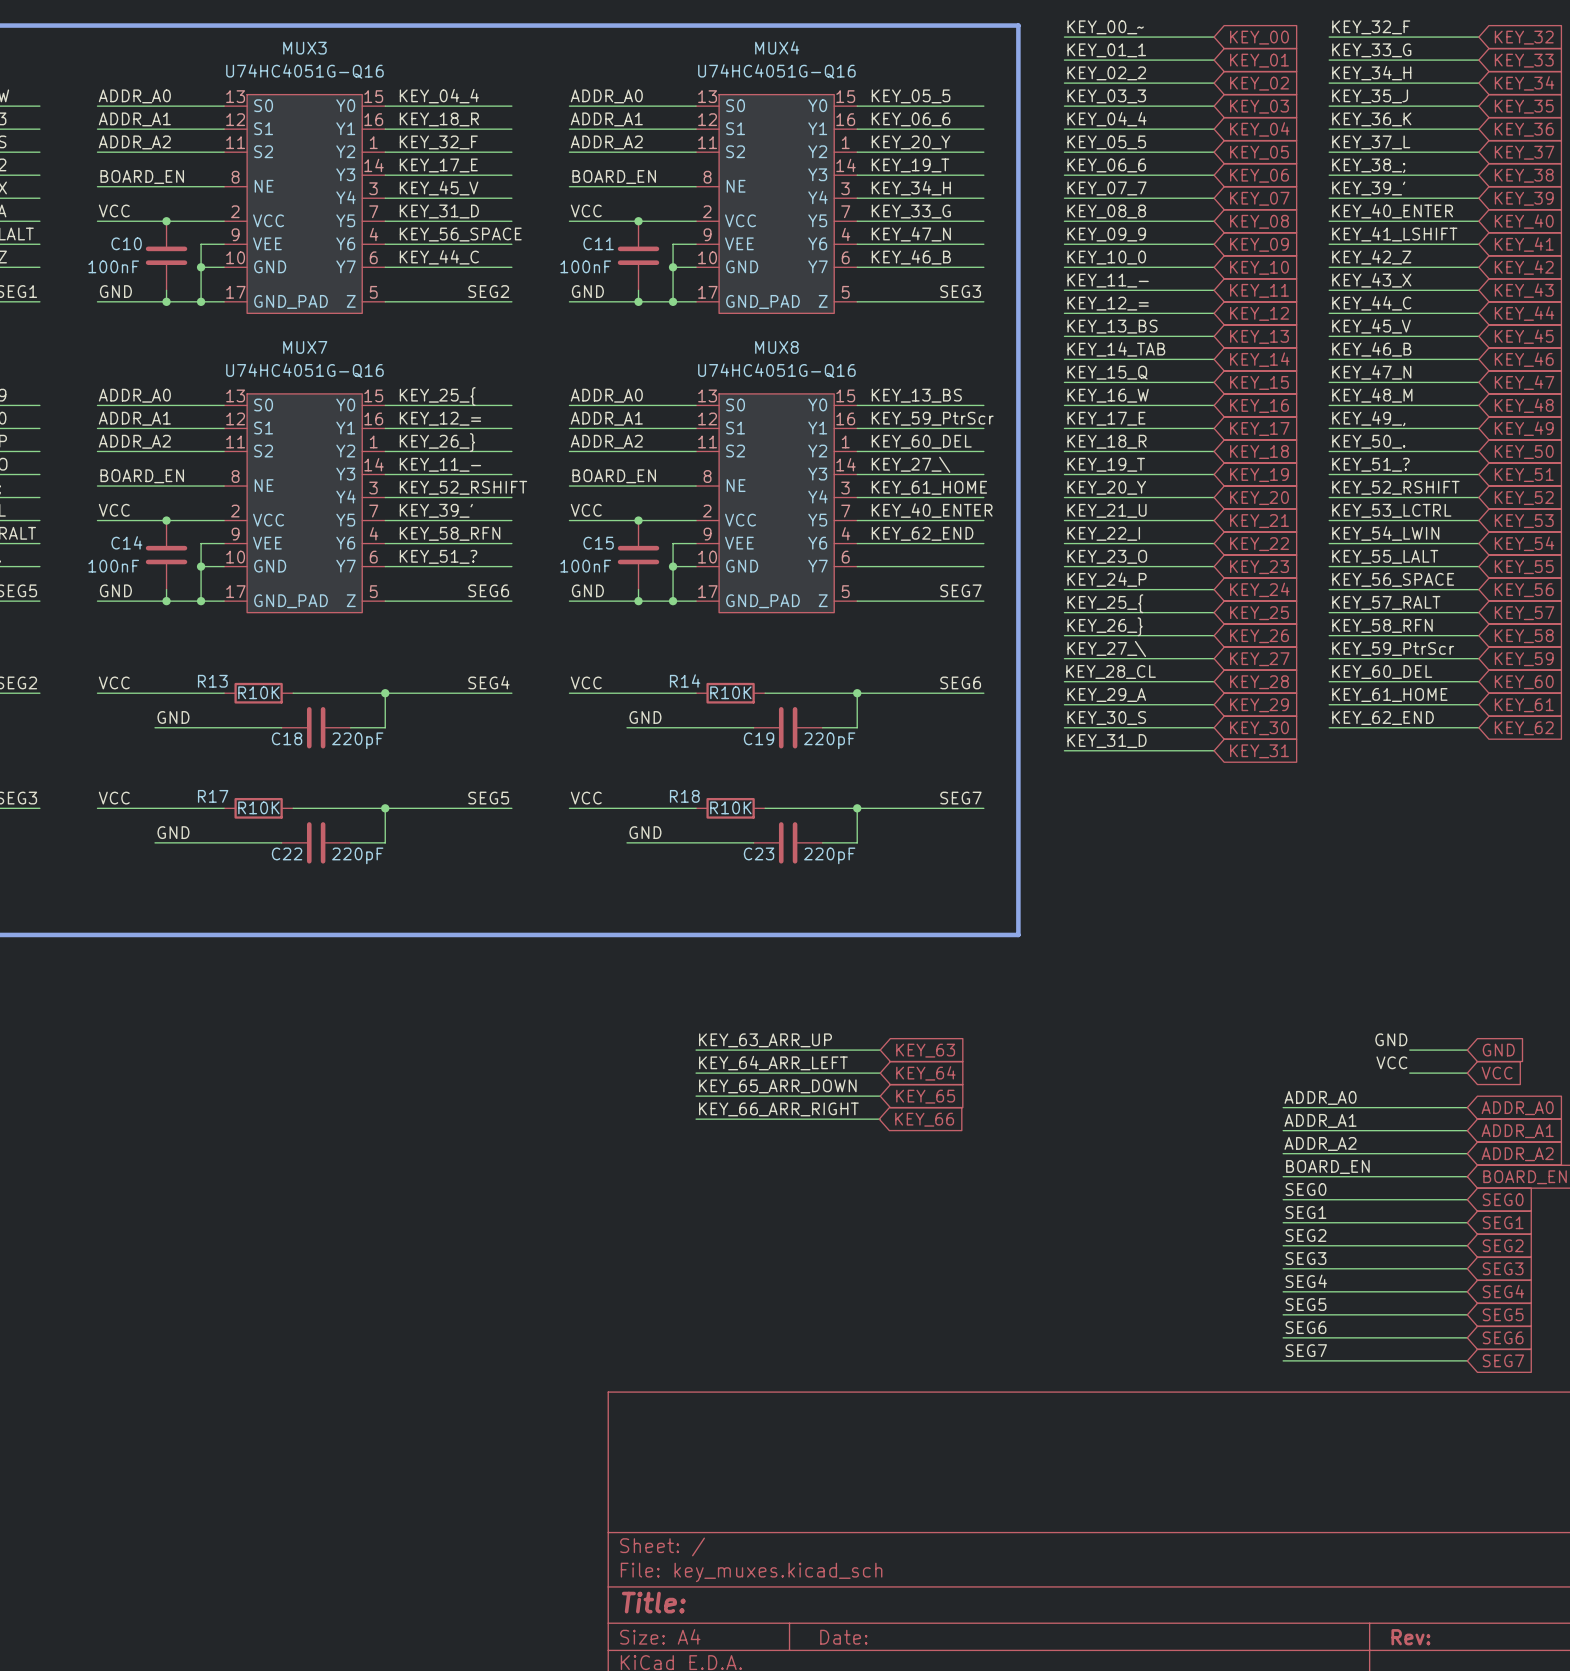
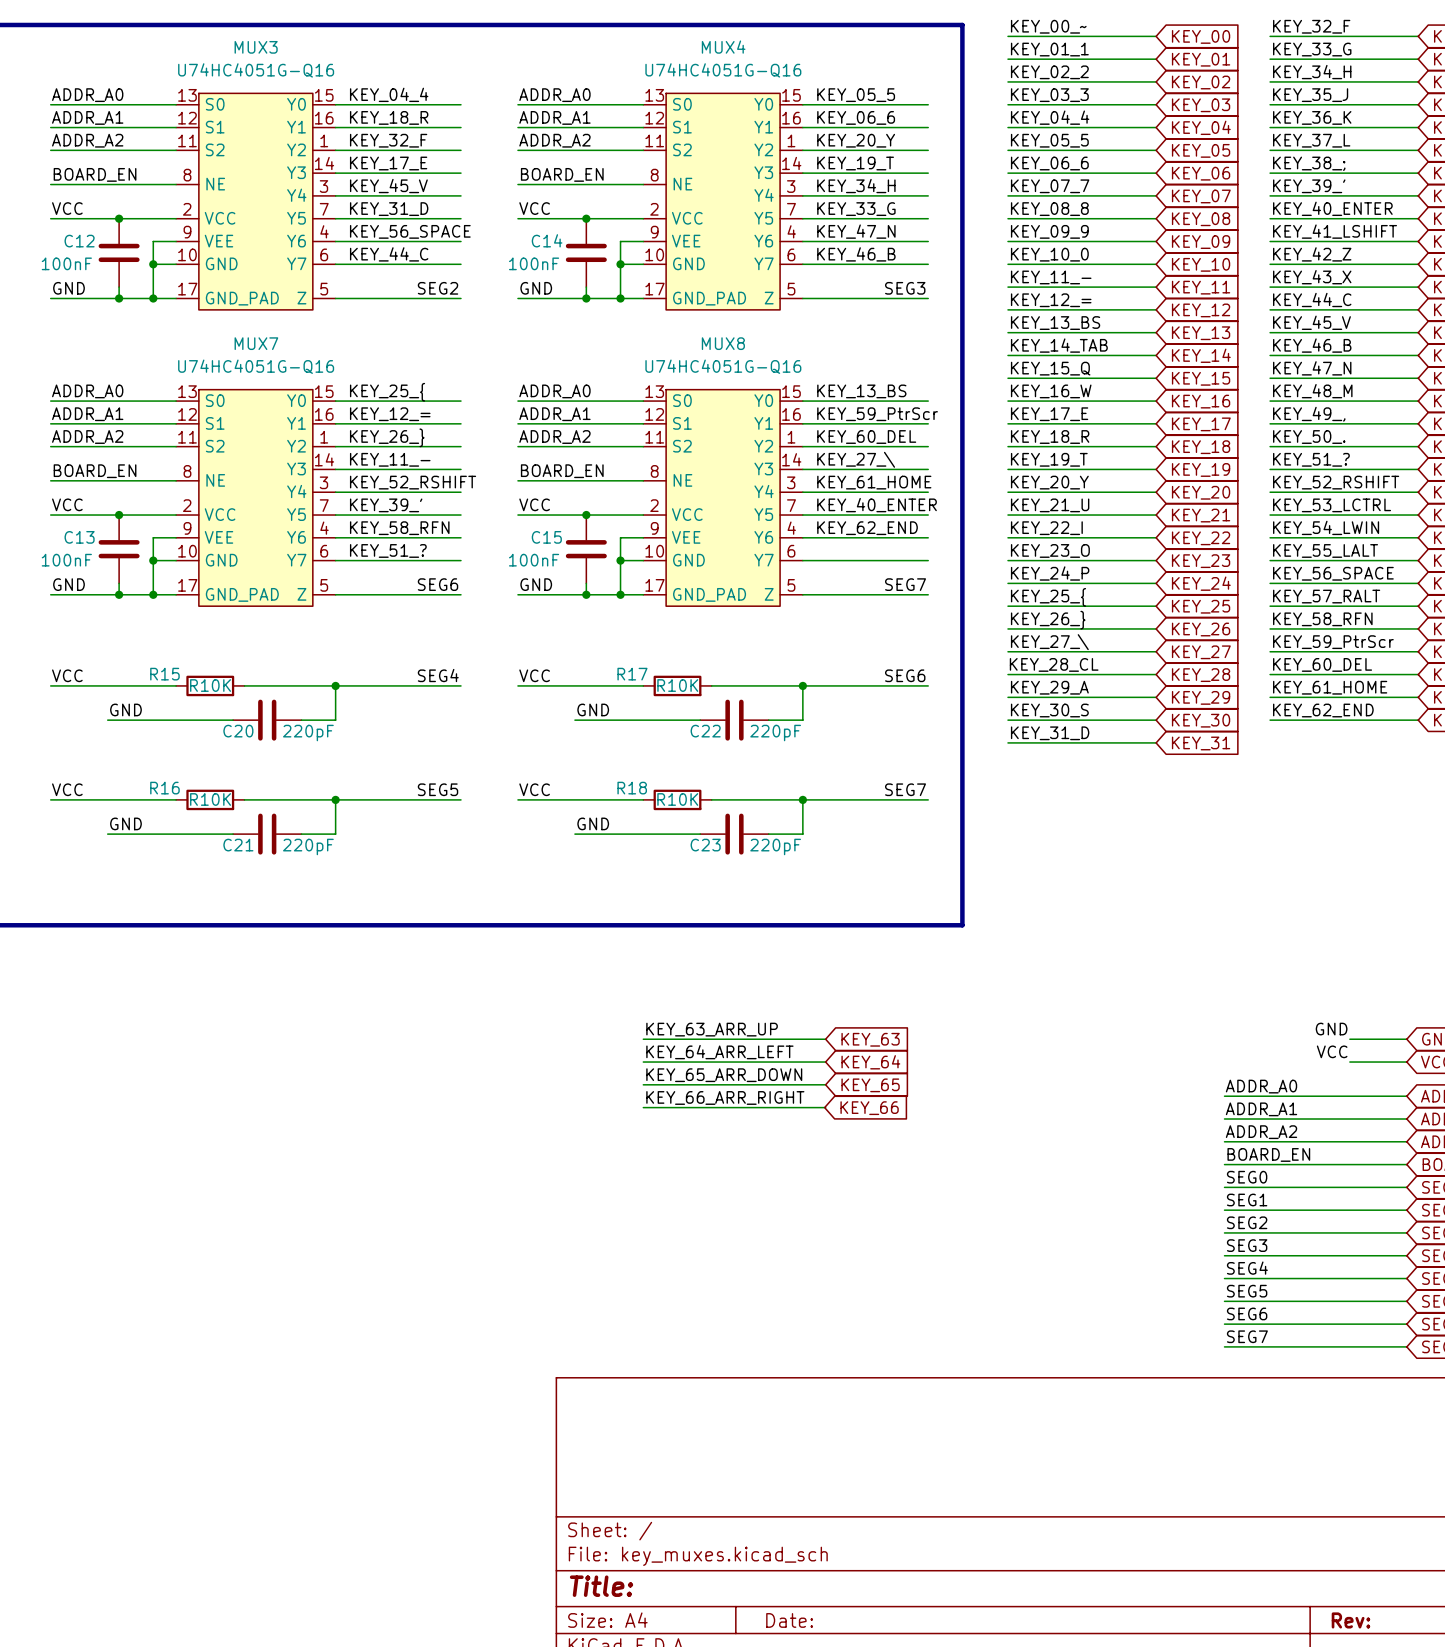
C10 name: C10 (126, 243) -> C12 (79, 241)
C11 name: C11 (598, 243) -> C14 (547, 240)
C14 name: C14 (126, 542) -> C13 (79, 537)
R13 name: R13 (212, 681) -> R15 (164, 674)
R14 name: R14 (685, 681) -> R17 (632, 674)
C18 name: C18 (287, 738) -> C20 (238, 731)
C19 name: C19 (759, 738) -> C22 (705, 731)
R17 name: R17 (213, 796) -> R16 (164, 788)
C22 name: C22 (287, 853) -> C21 (238, 845)

